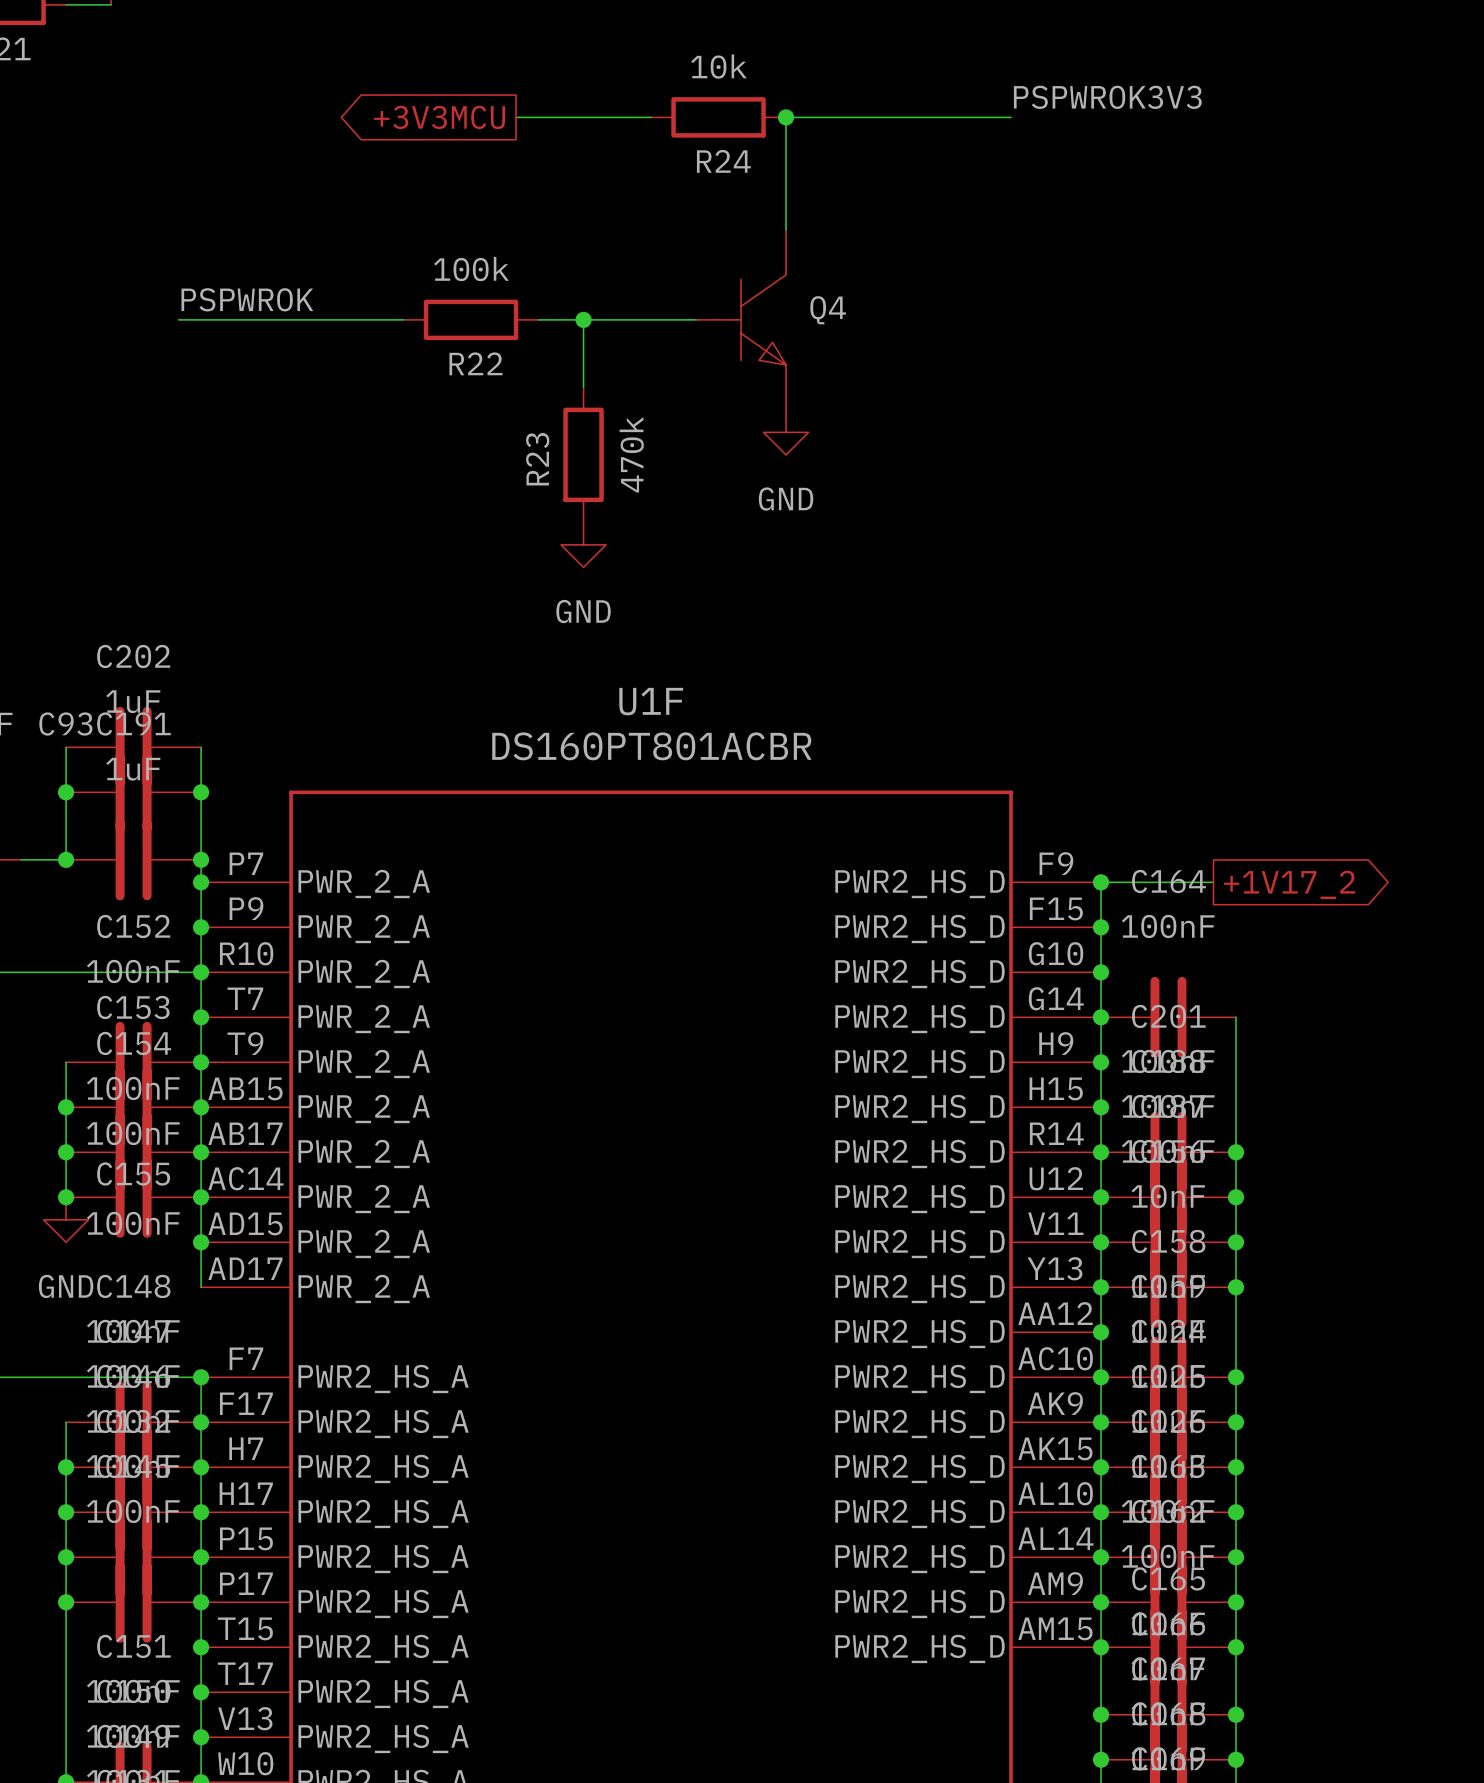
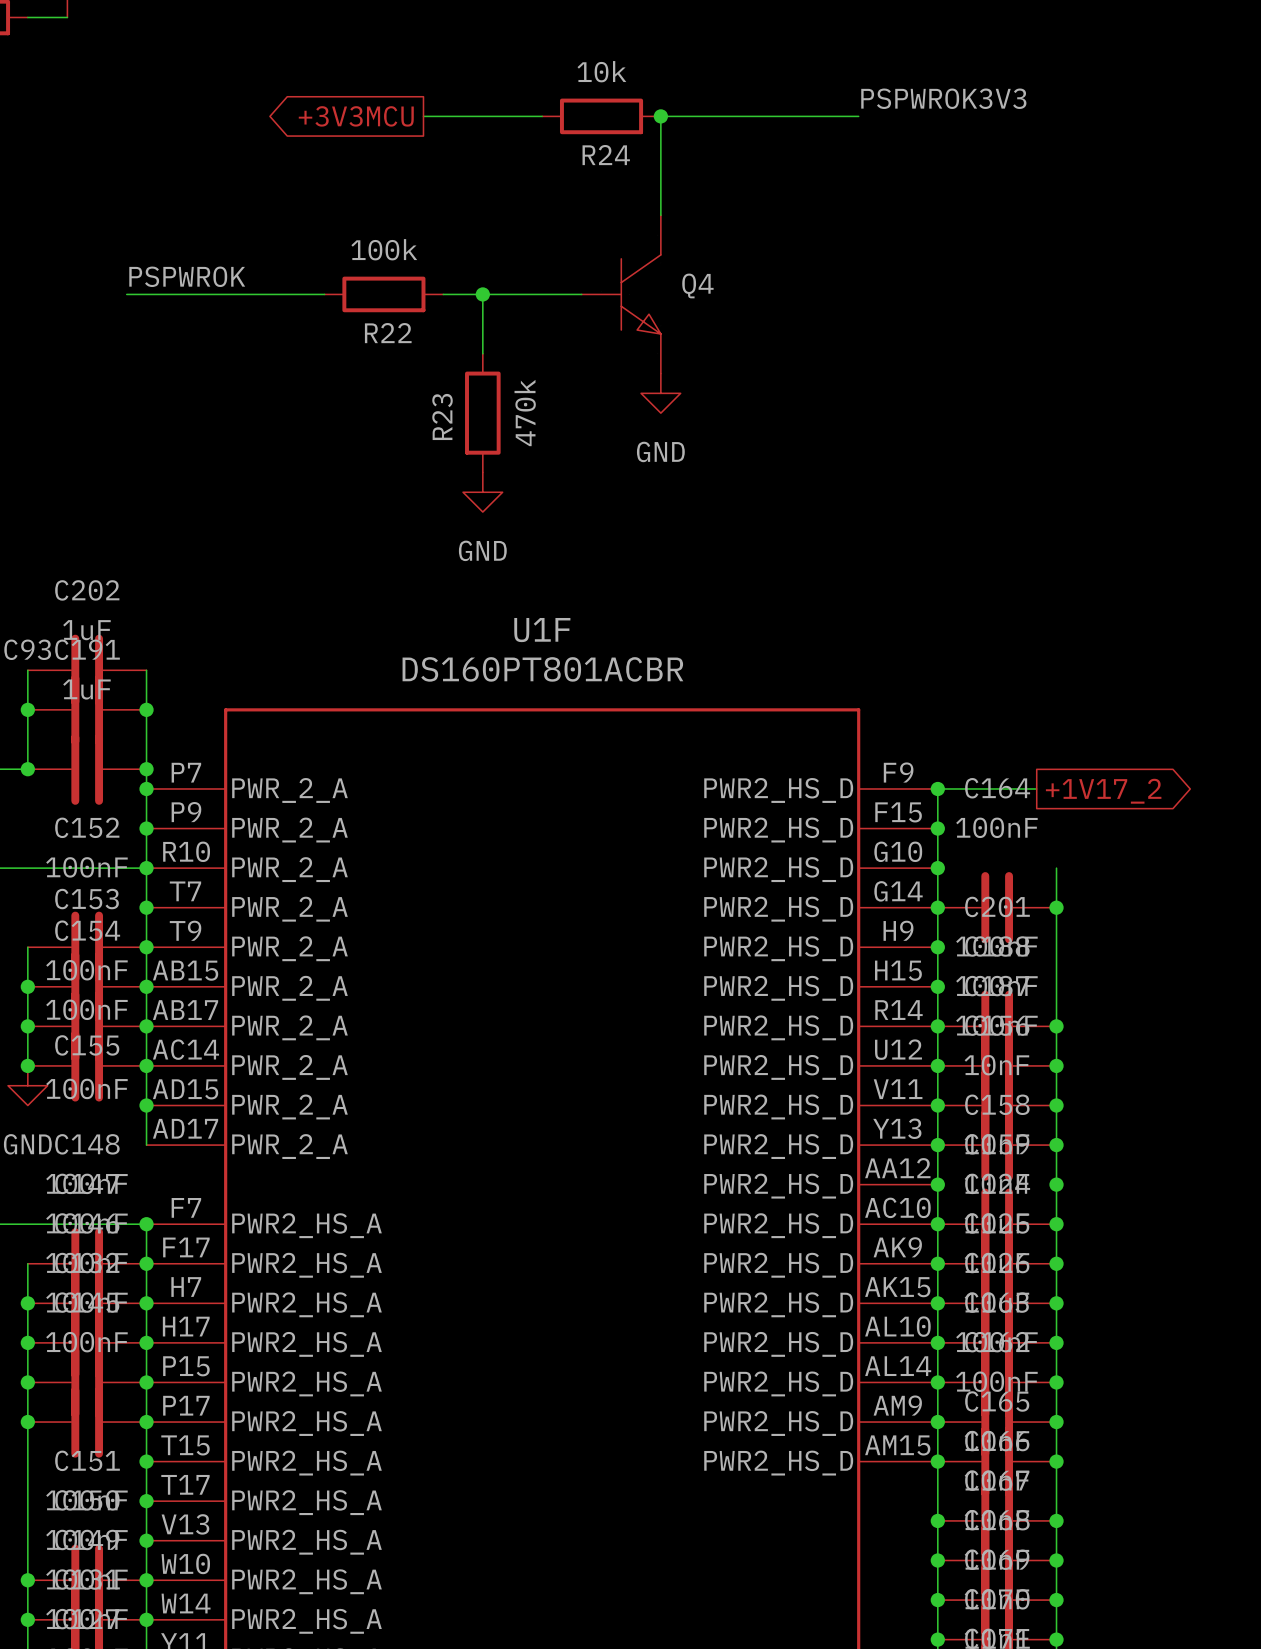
wire: none -> (1056, 868) (1056, 907)
junction: none -> (1056, 907)
junction: none -> (1056, 1184)

